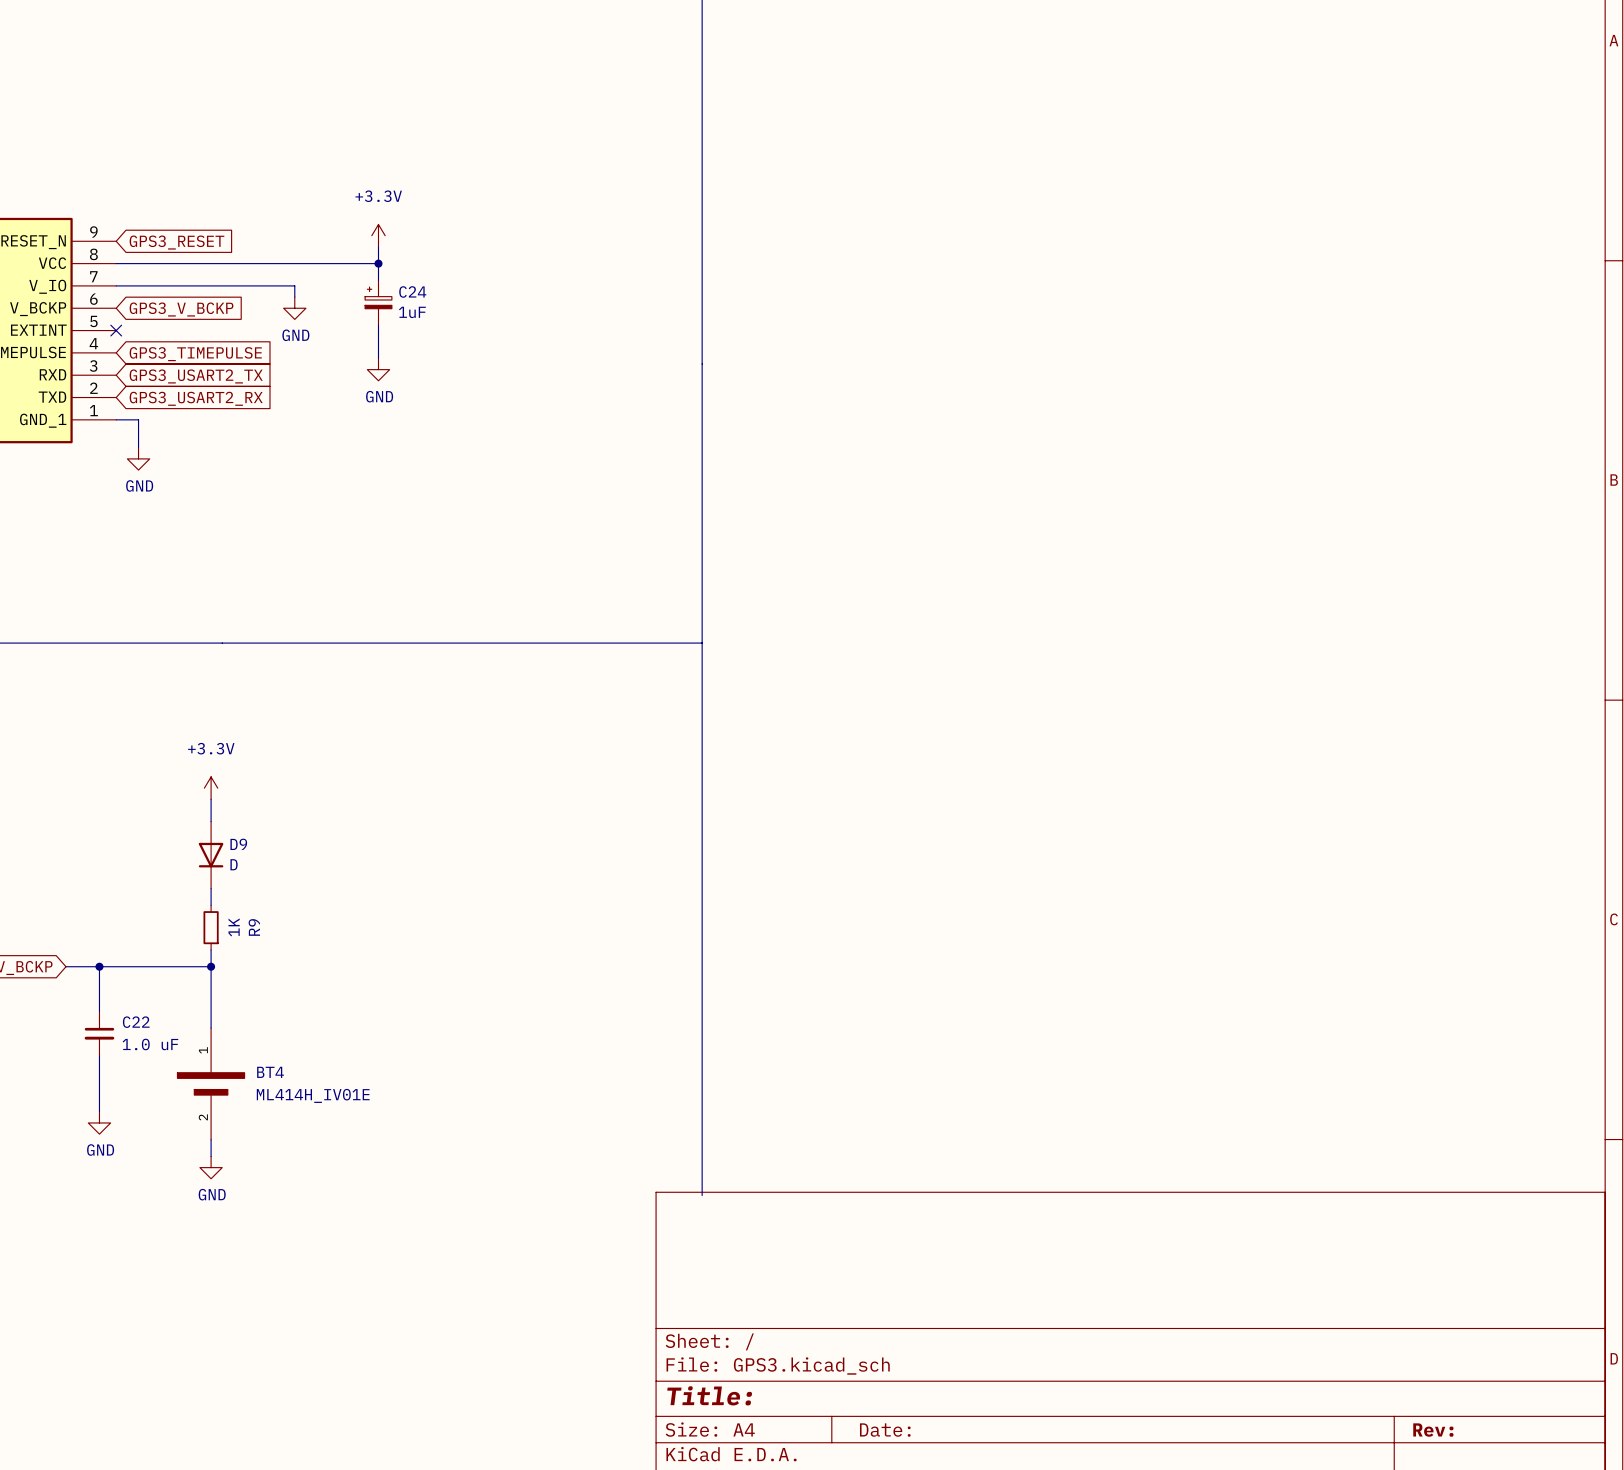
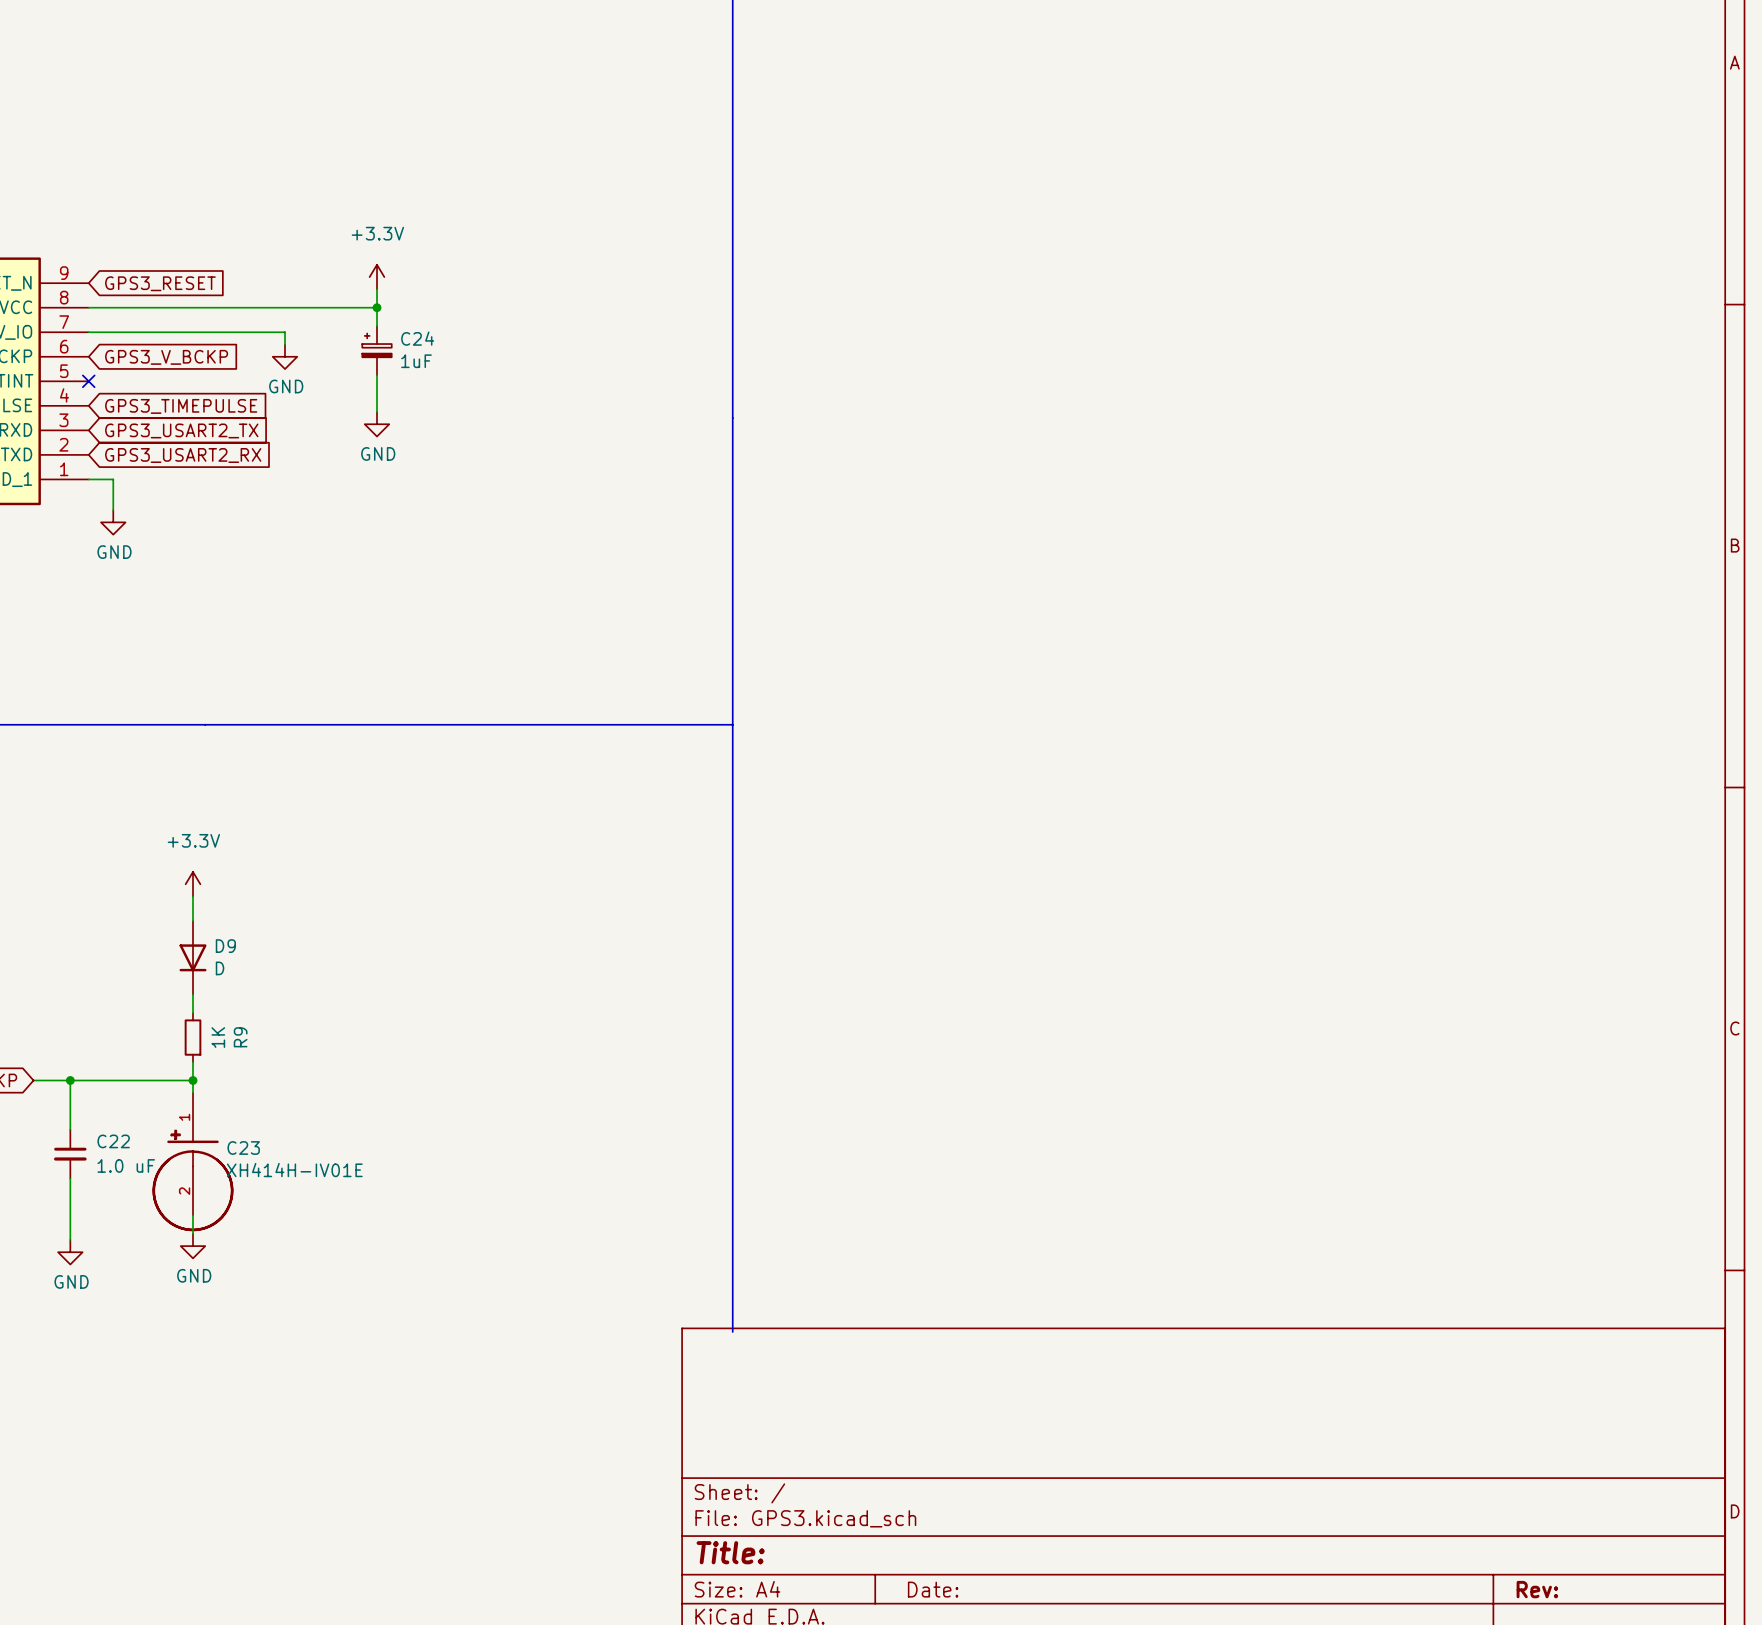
C23: none -> XH414H-IV01E (192, 1162)
BT4: ML414H_IV01E (211, 1083) -> none
power symbol position: GND (211, 1167) -> GND (193, 1246)

